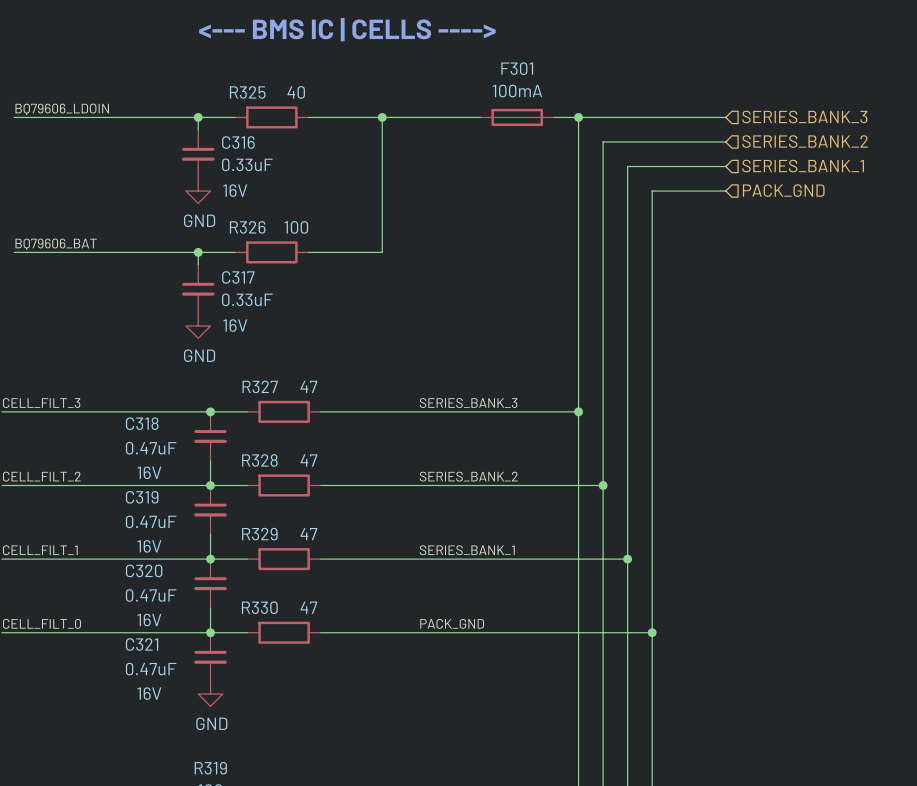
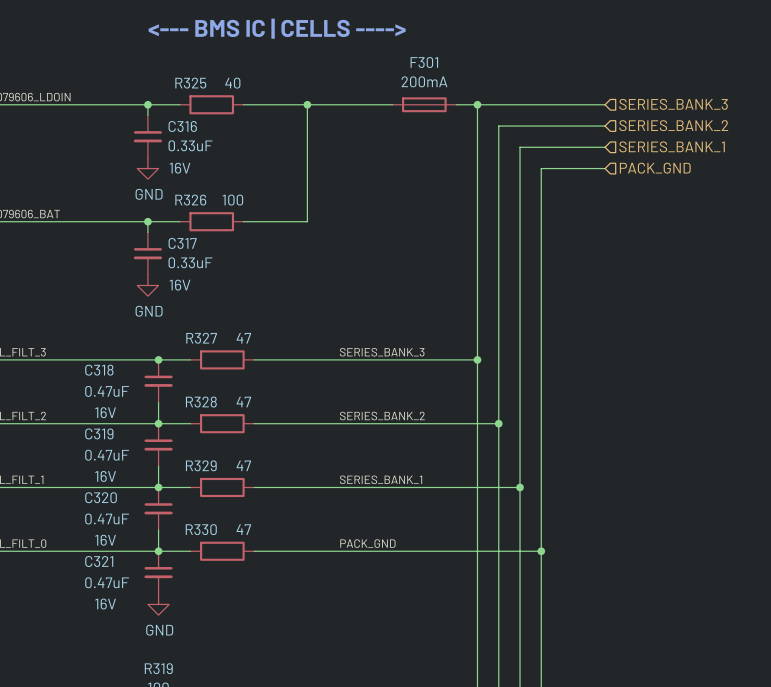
F301 value: 100mA (517, 90) -> 200mA (424, 81)

